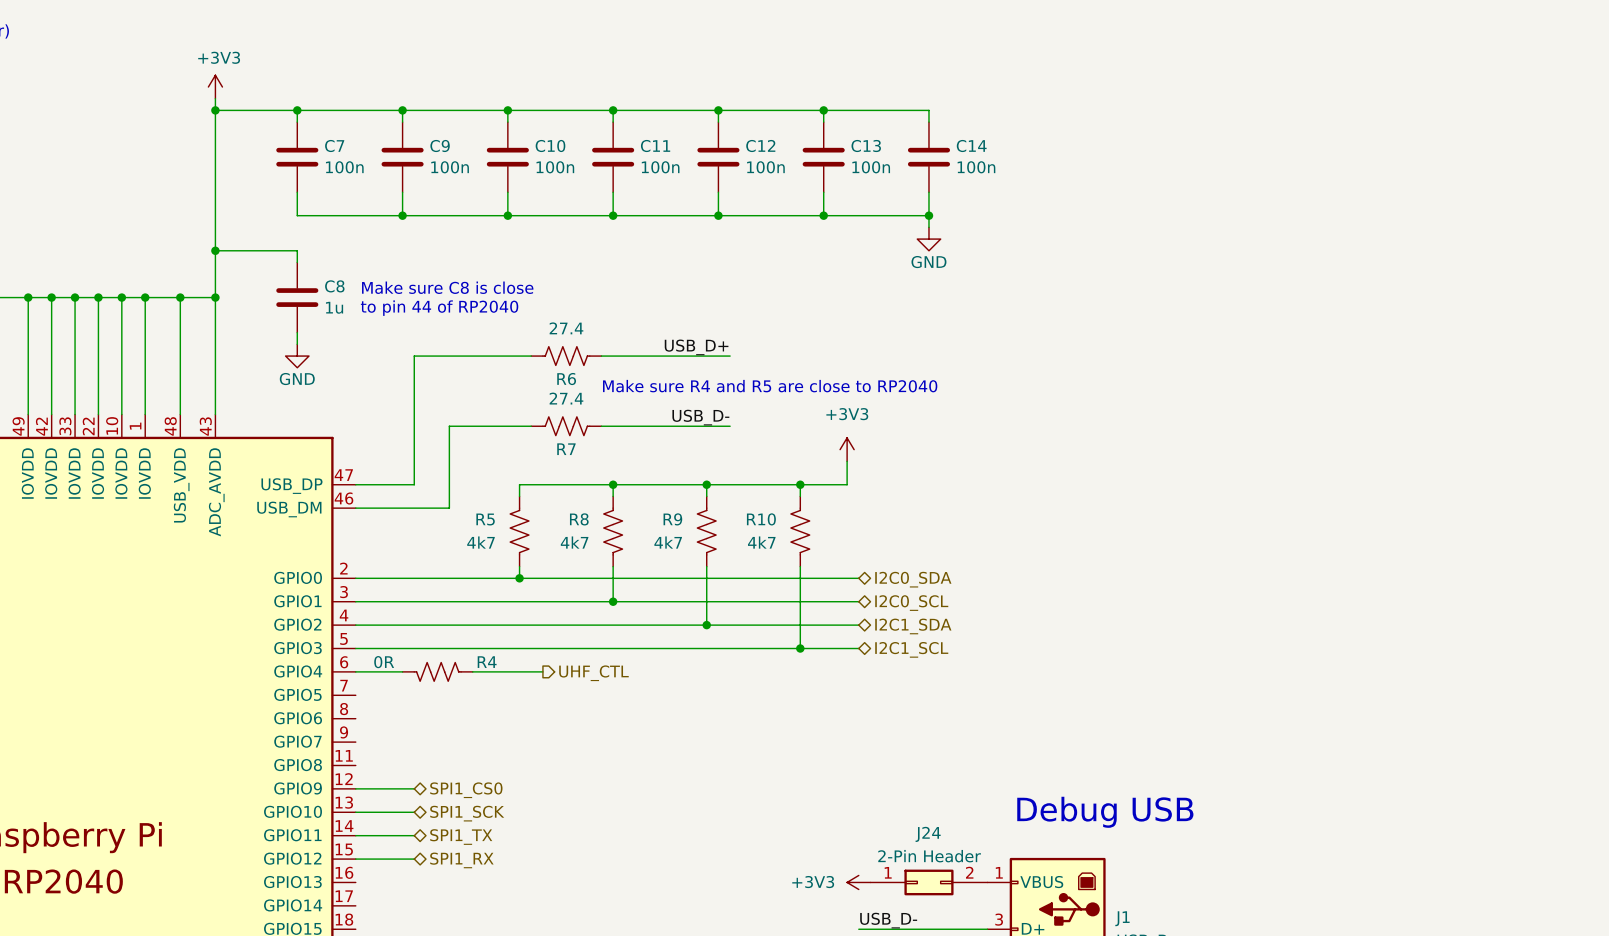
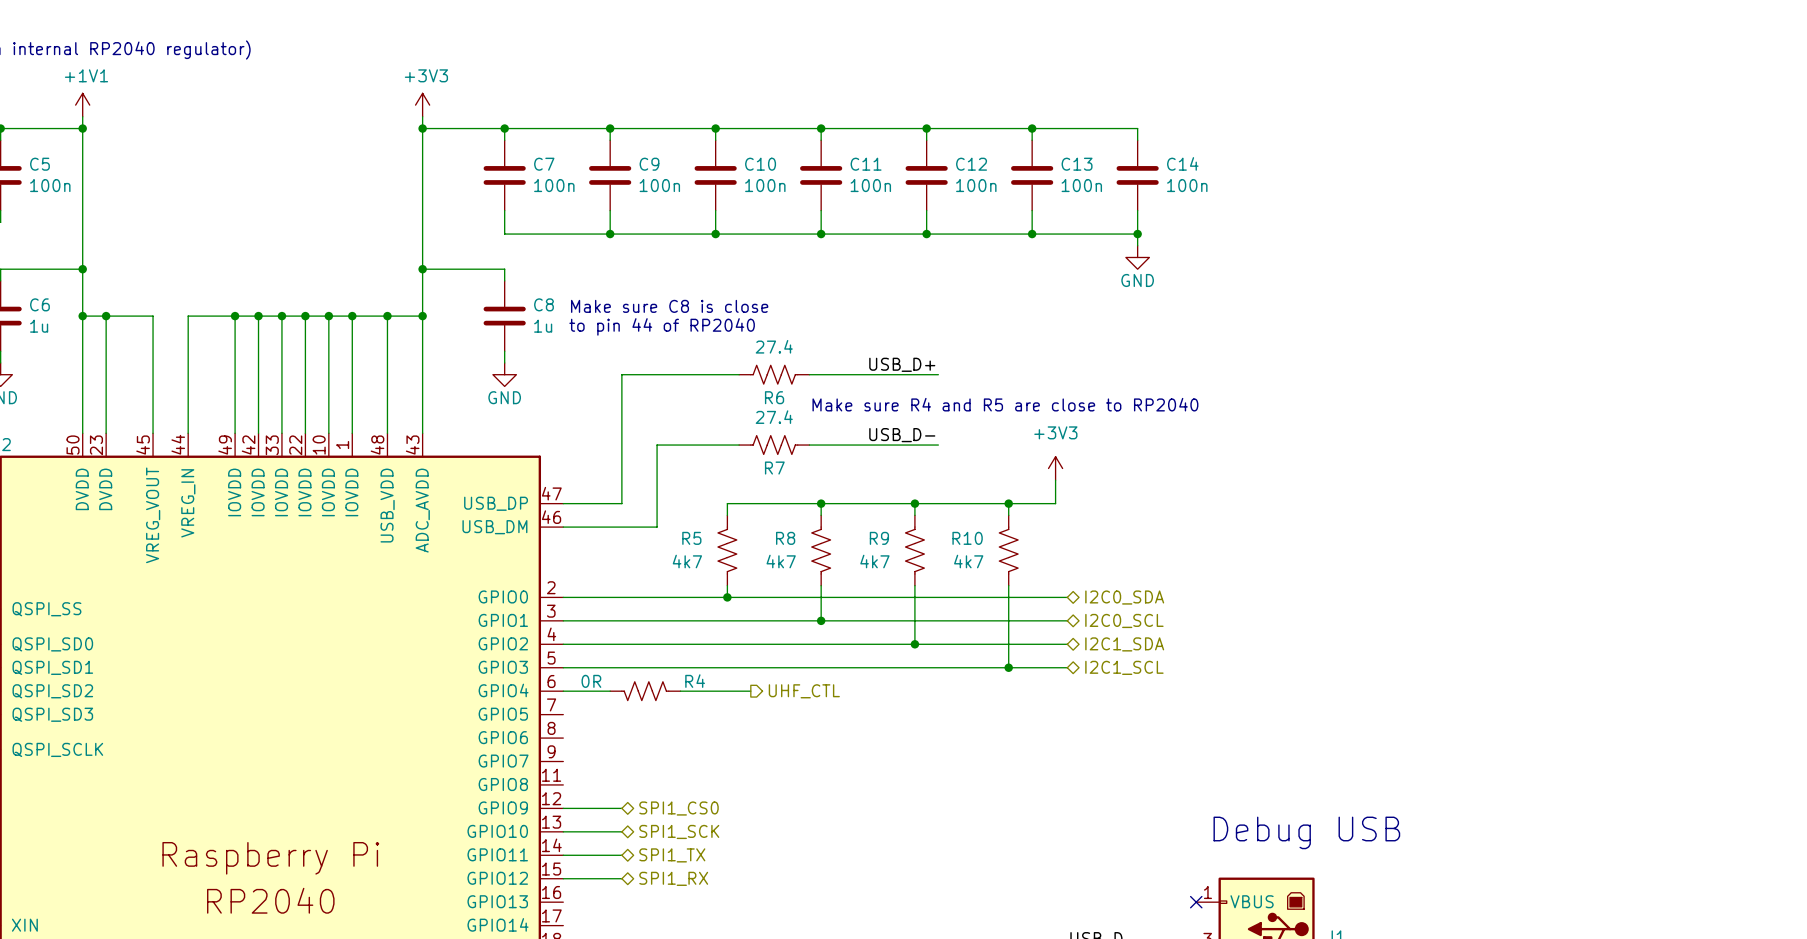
power symbol: +3V3 (858, 882) -> none
J24: 2-Pin Header (928, 882) -> none
no-connect mark: none -> (1196, 902)

